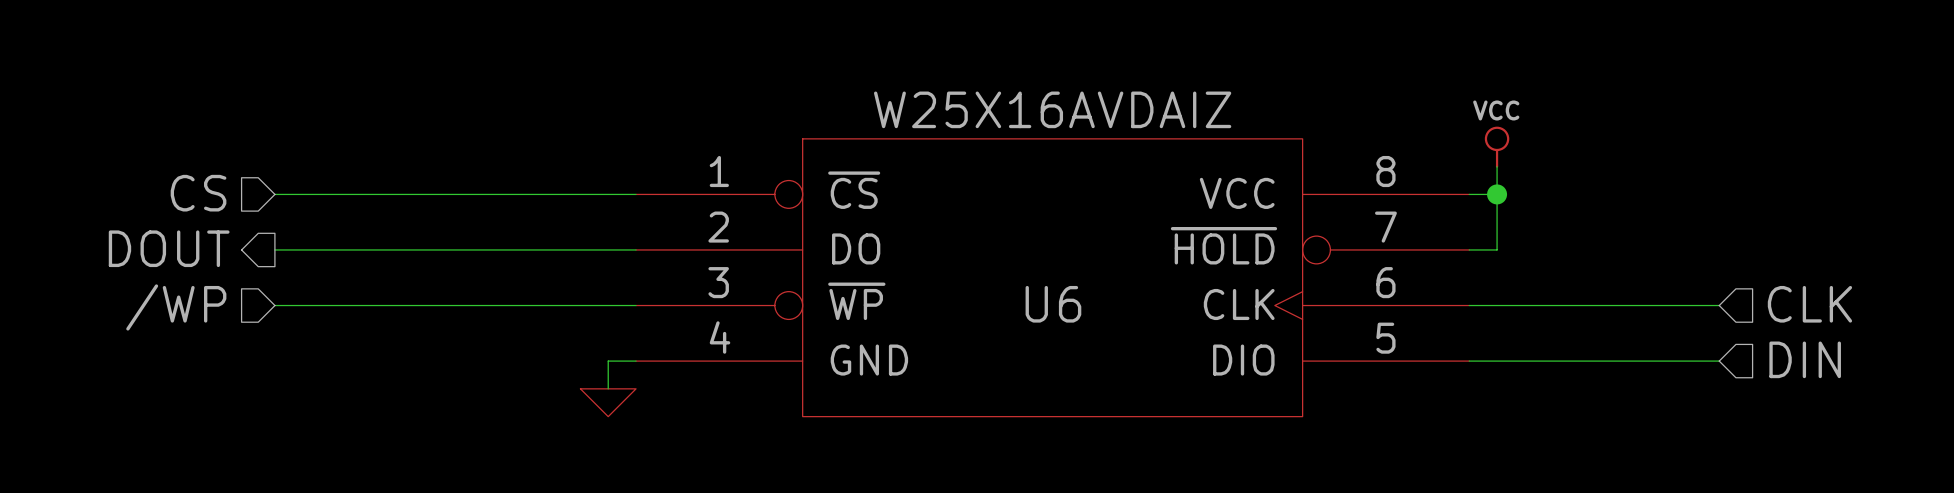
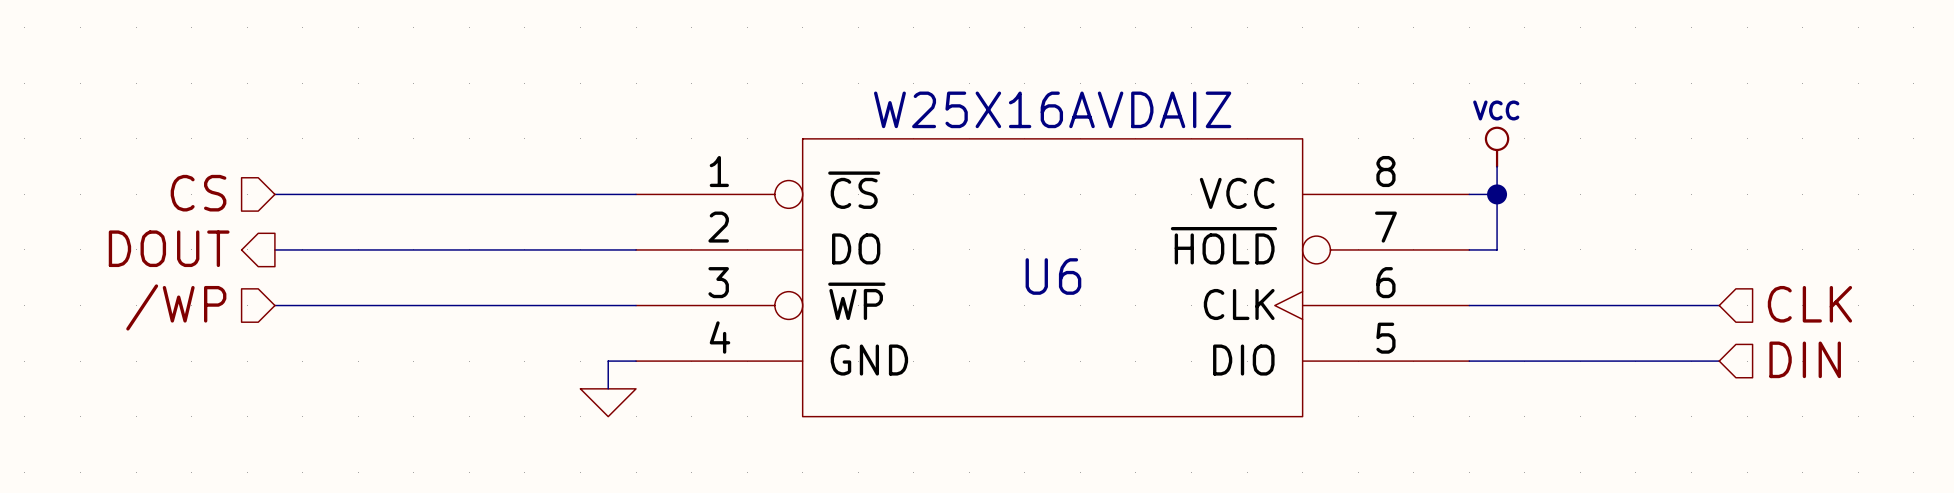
U6 name position: U6 (1053, 304) -> U6 (1053, 276)

